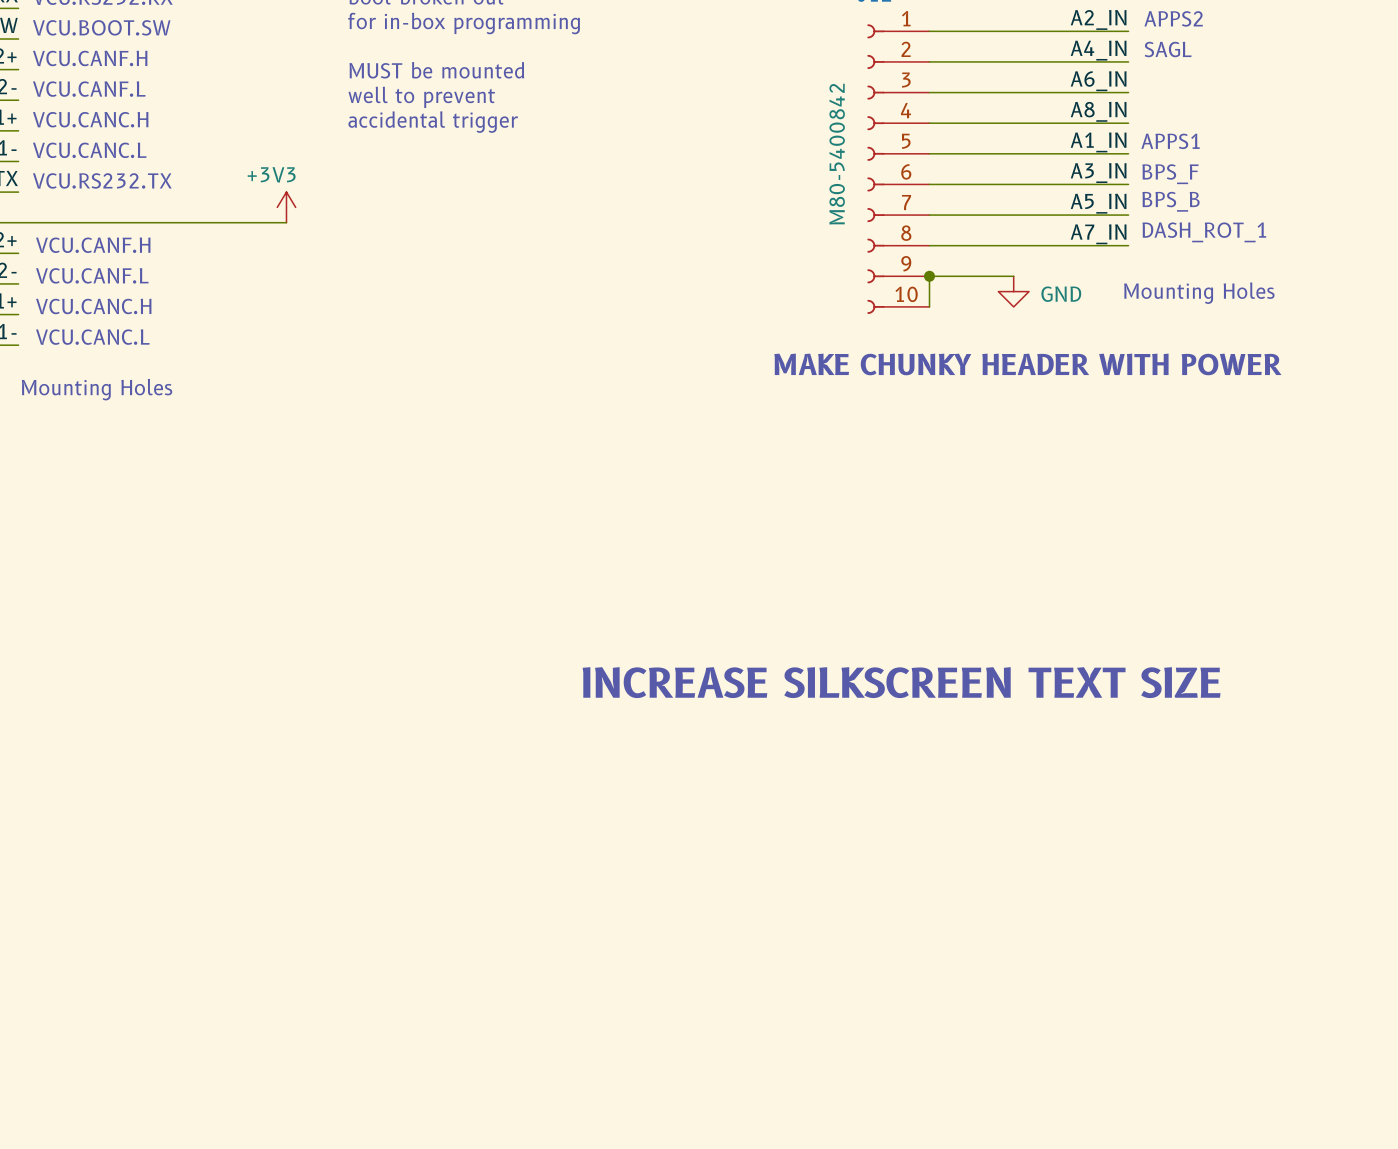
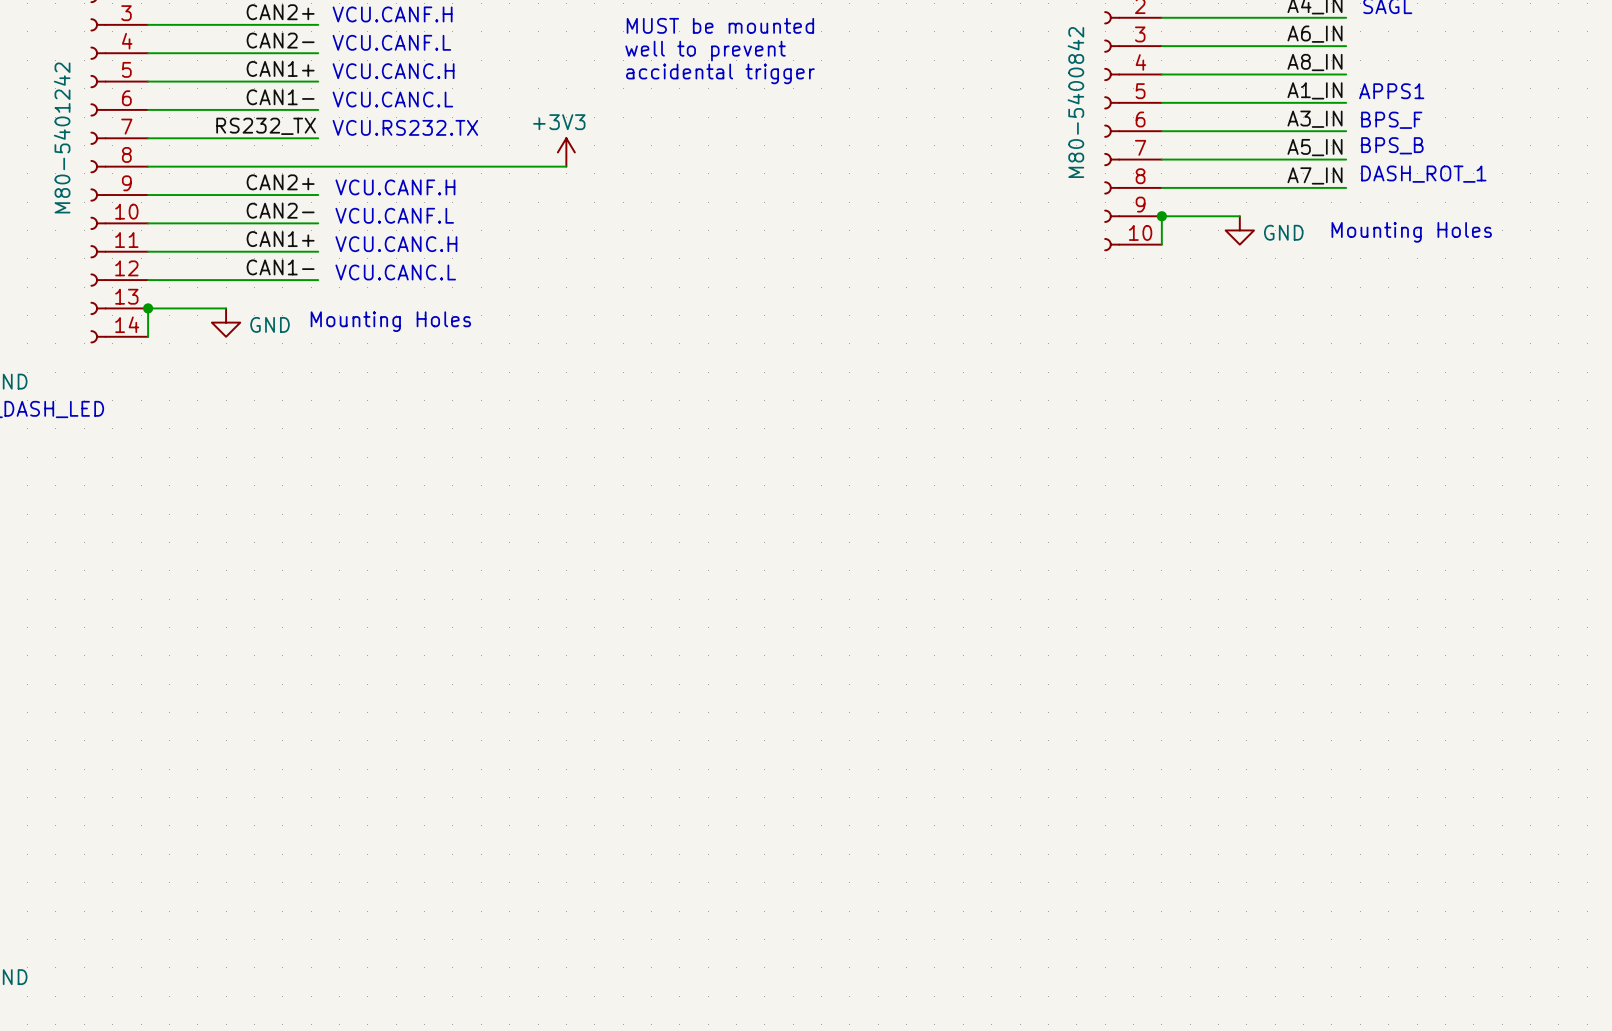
text: MAKE CHUNKY HEADER WITH POWER (1027, 364) -> none
text: INCREASE SILKSCREEN TEXT SIZE (901, 682) -> none

